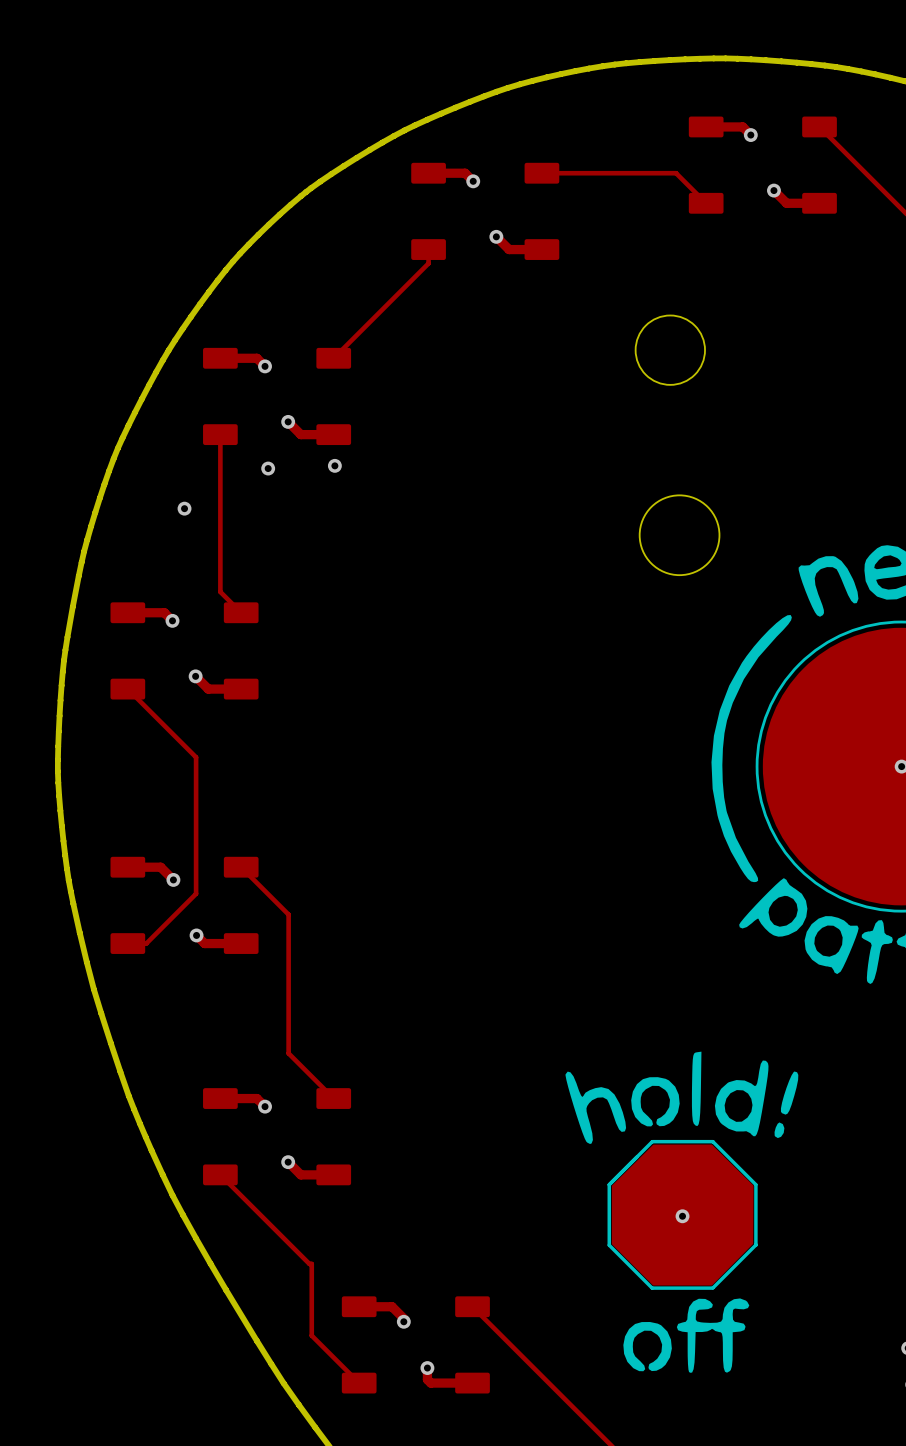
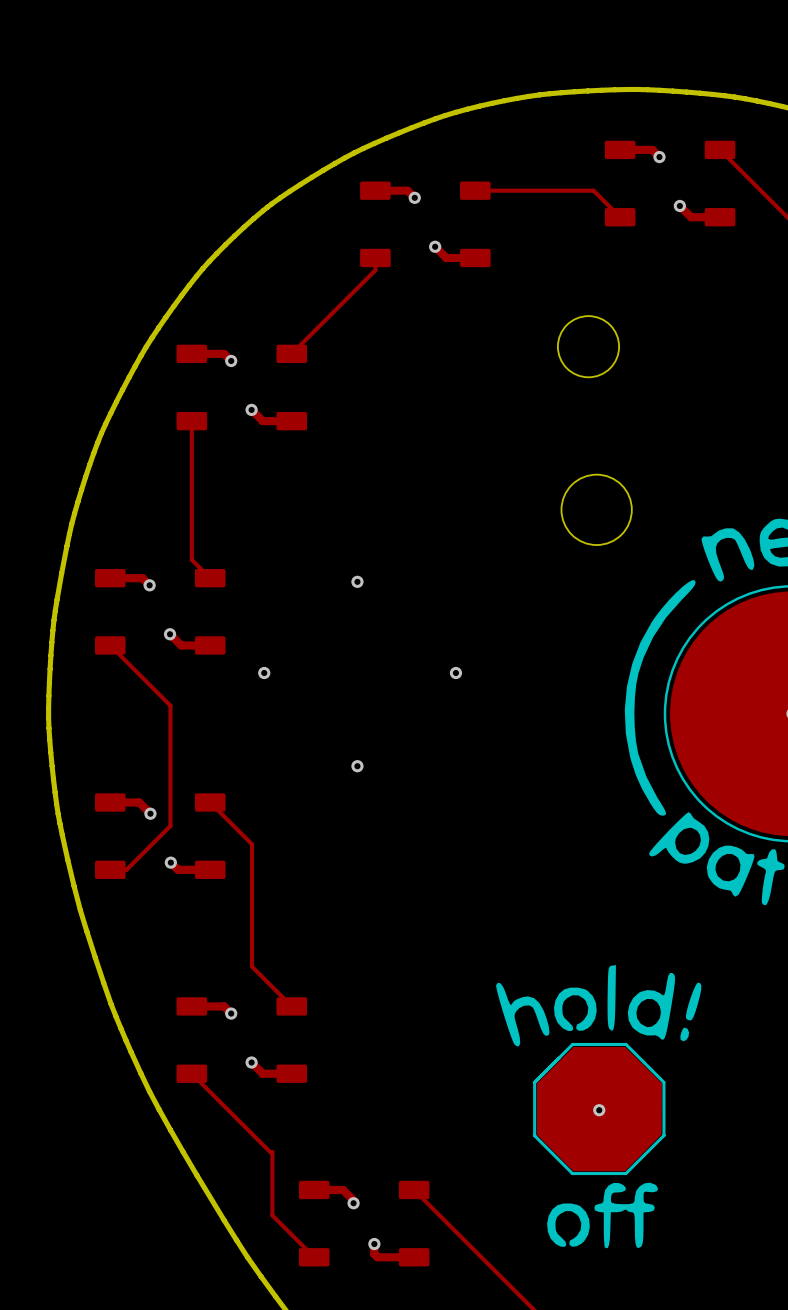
via: (334, 465) -> none
via: (268, 468) -> none
via: (184, 508) -> none
via: none -> (357, 581)
via: none -> (264, 673)
via: none -> (455, 673)
via: none -> (357, 766)

